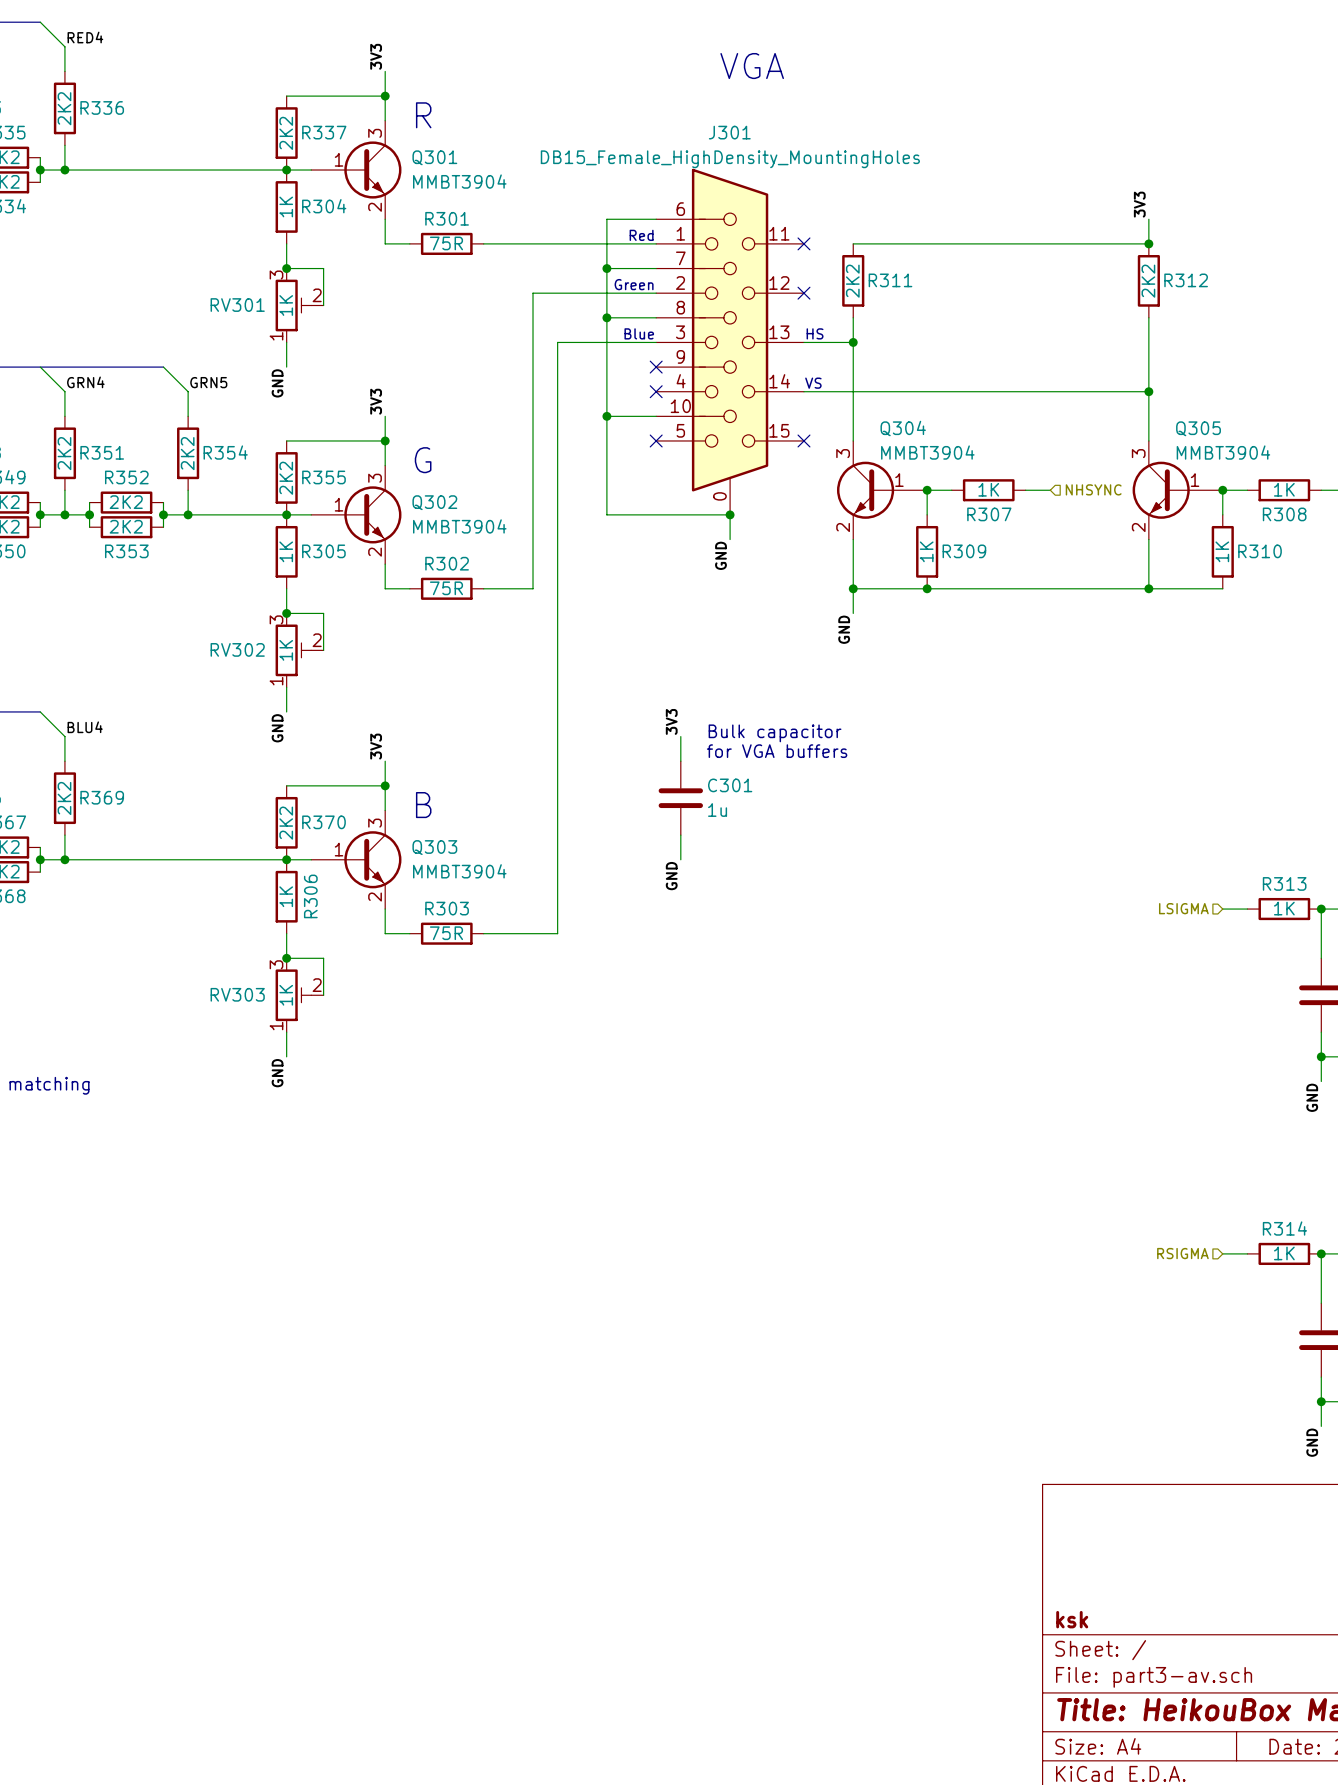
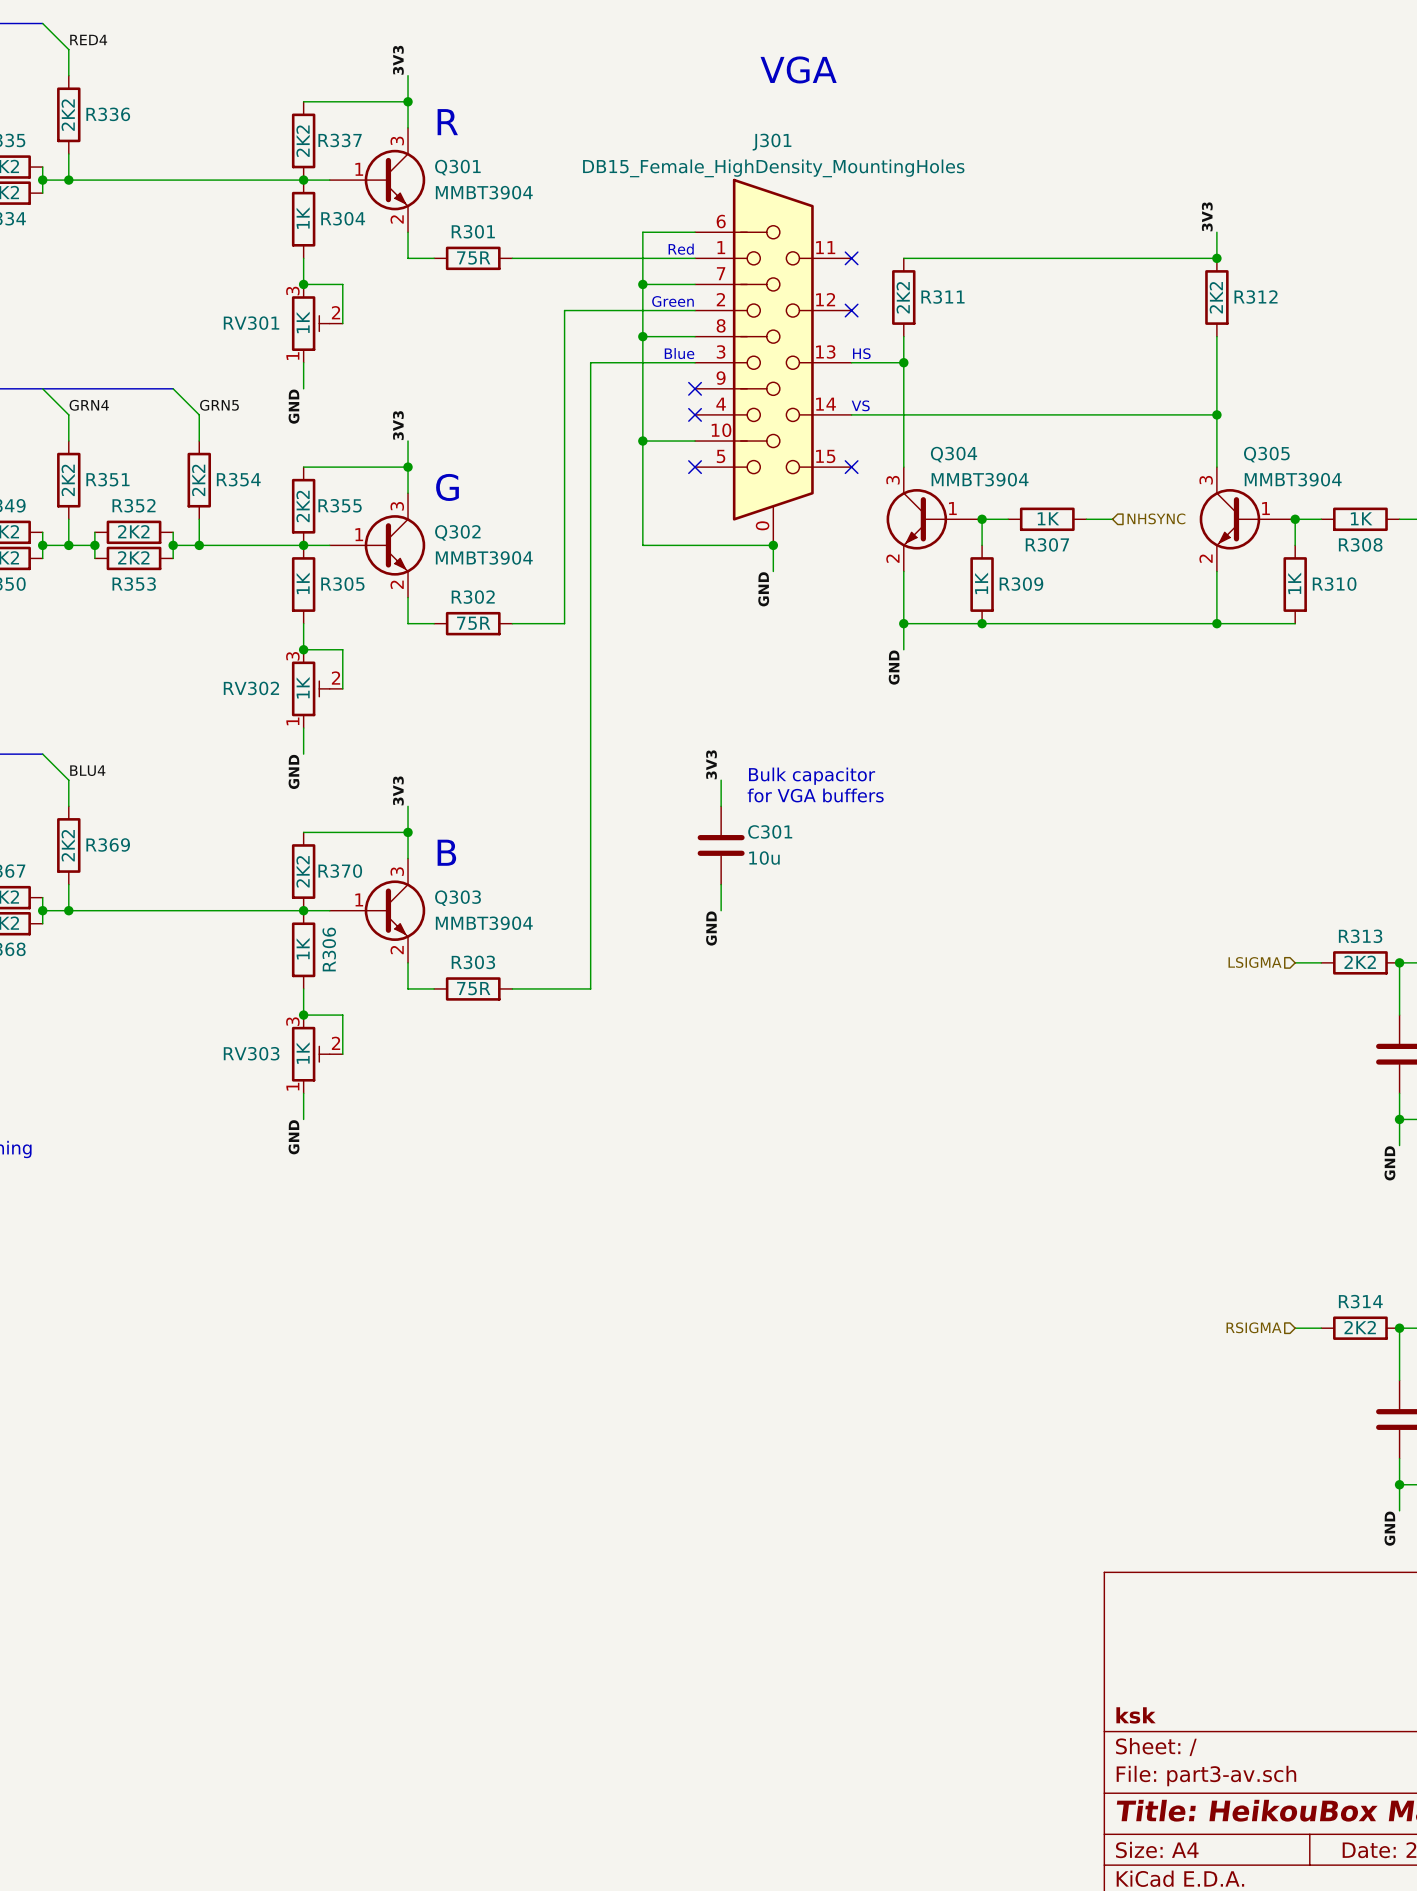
C301 value: 1u (717, 810) -> 10u (764, 858)
R313 value: 1K (1284, 908) -> 2K2 (1360, 962)
R314 value: 1K (1284, 1253) -> 2K2 (1360, 1327)

